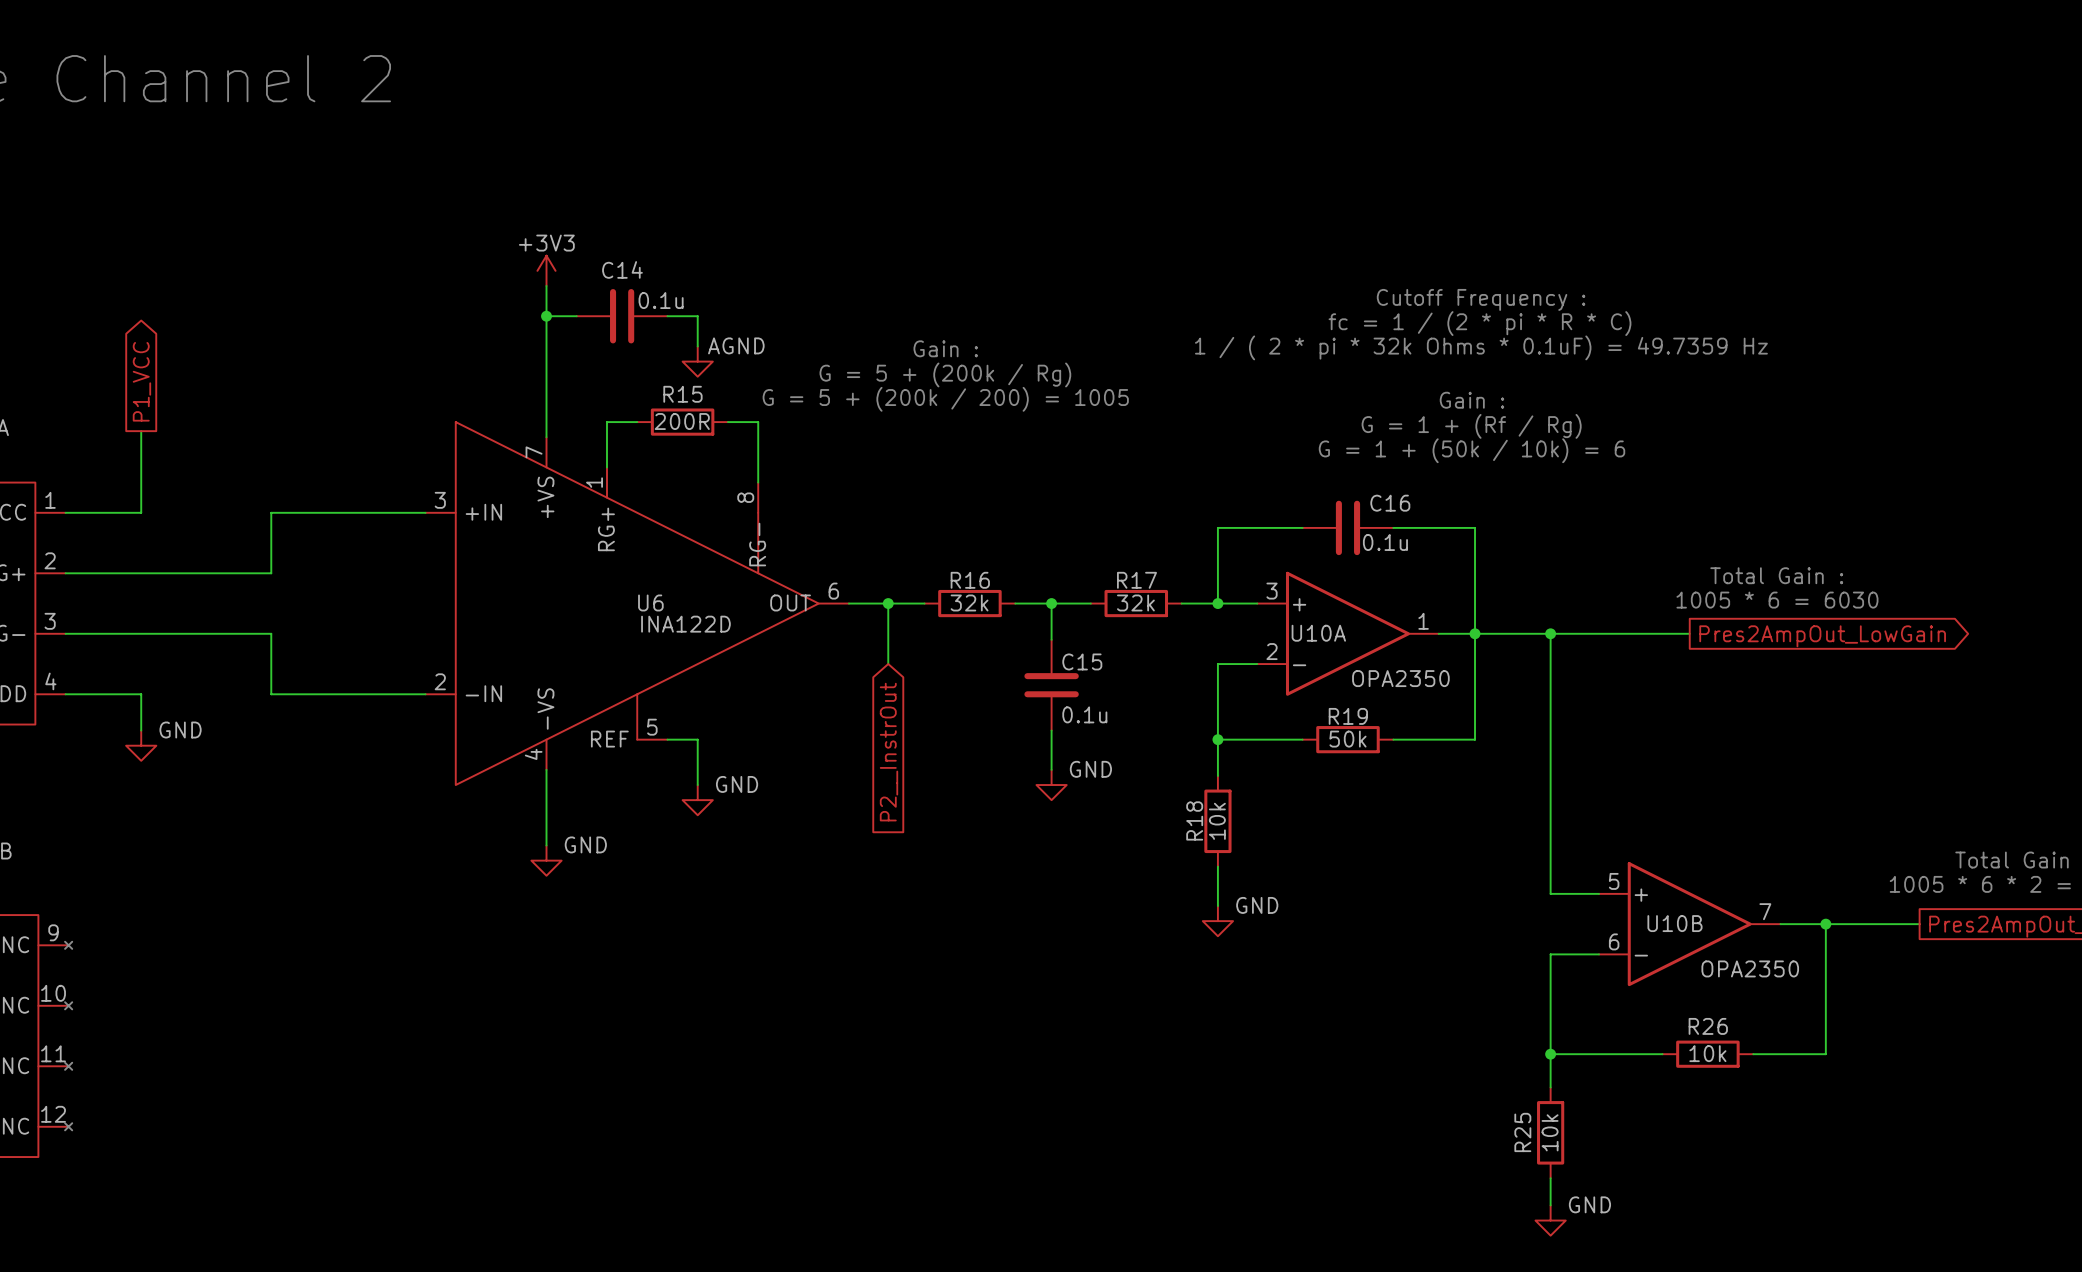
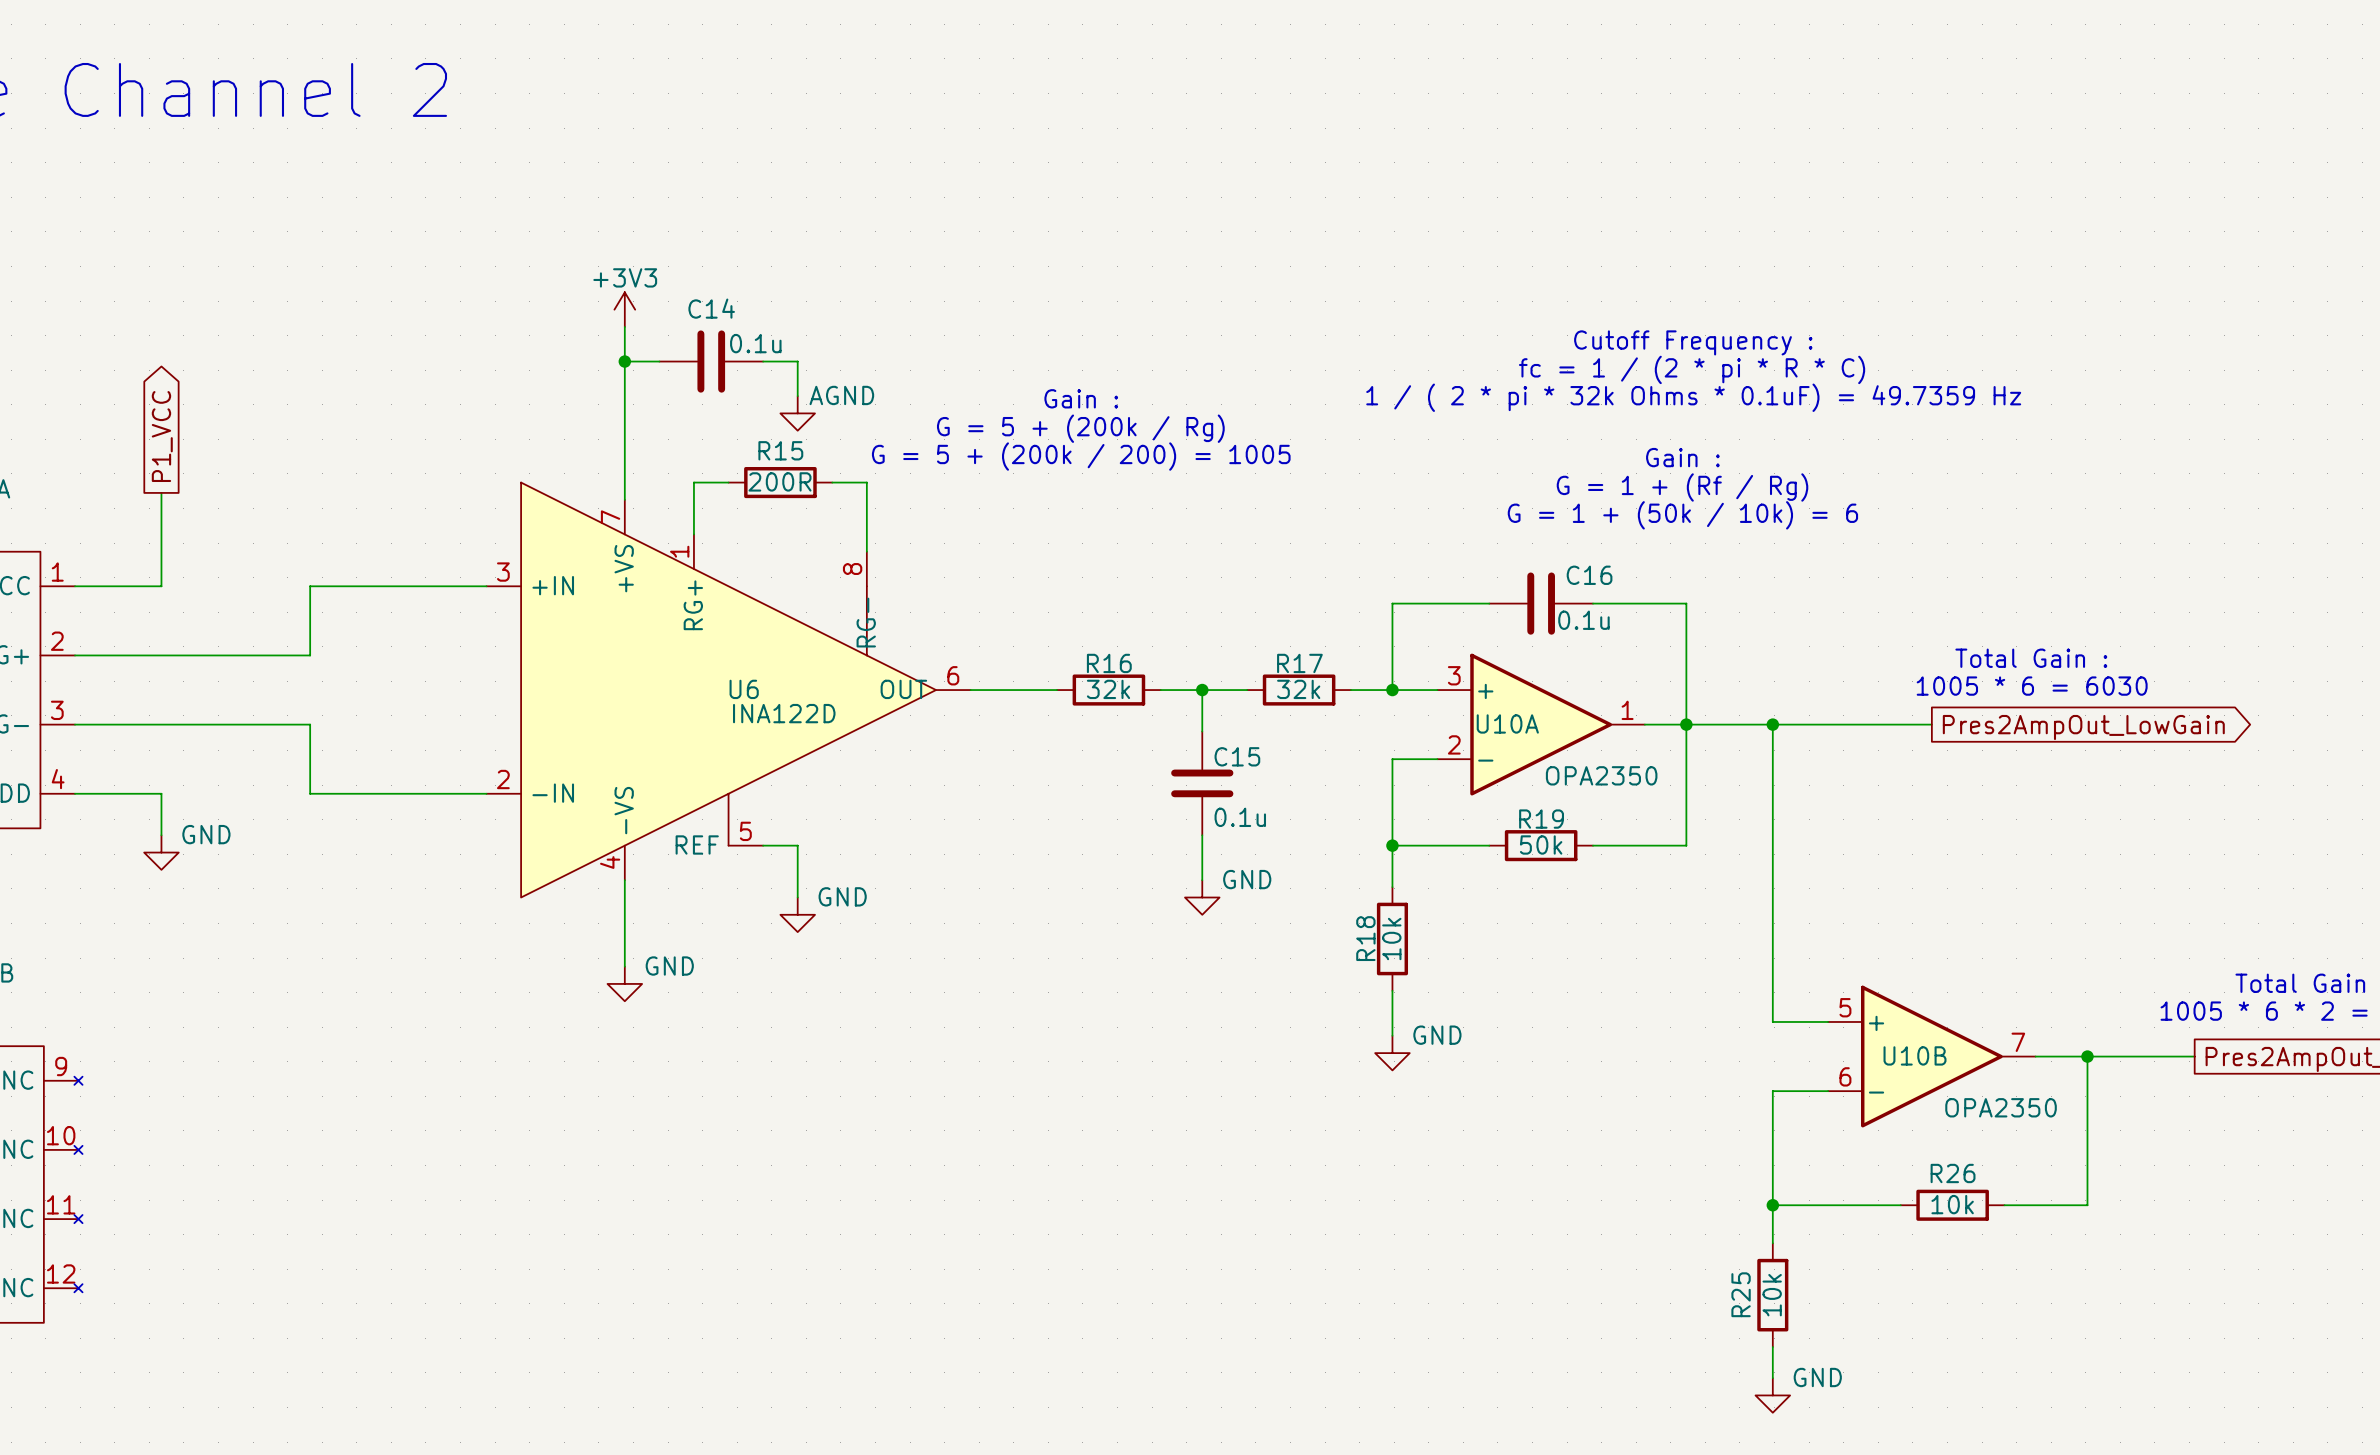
wire: (888, 603) (888, 664) -> none
junction: (888, 603) -> none
global label: P2__InstrOut (888, 752) -> none

